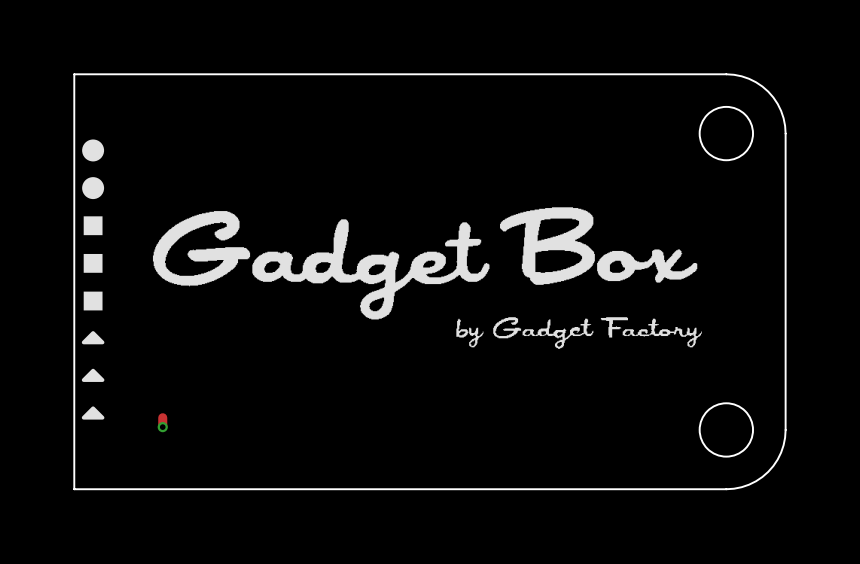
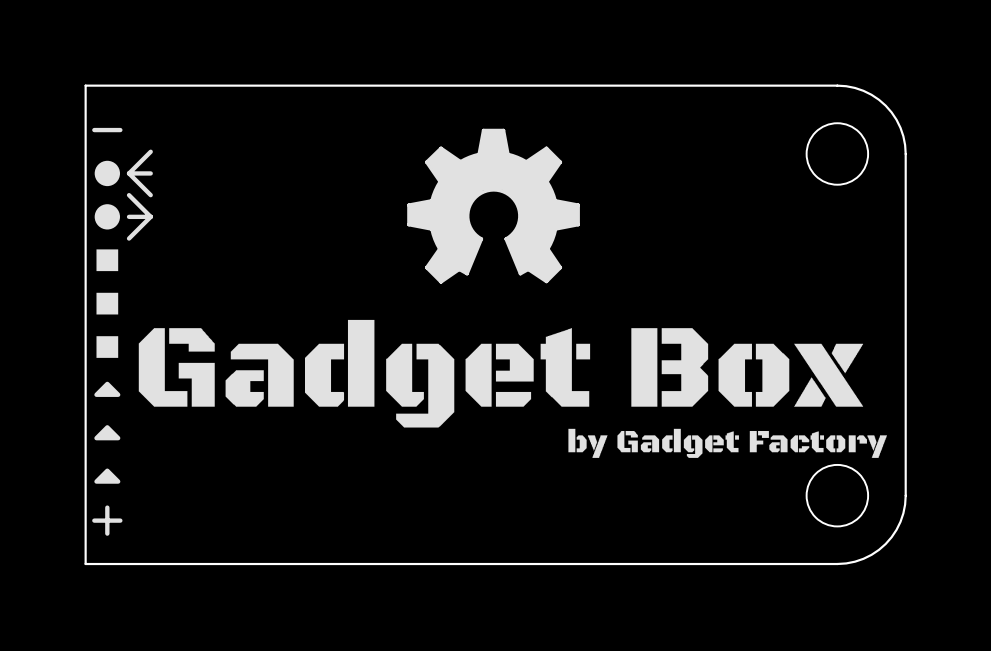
drawing: none -> [407, 128, 580, 284]
line: none -> (94, 130) (120, 130)
line: none -> (150, 151) (129, 173)
line: none -> (129, 173) (150, 195)
line: none -> (129, 173) (150, 173)
line: none -> (129, 195) (150, 216)
line: none -> (129, 216) (150, 216)
line: none -> (150, 216) (129, 238)
drawing: [152, 207, 702, 349] -> none
drawing: none -> [138, 319, 887, 458]
track: (162, 417) (162, 427) -> none
via: (162, 427) -> none
line: none -> (107, 507) (107, 533)
line: none -> (94, 520) (120, 520)

